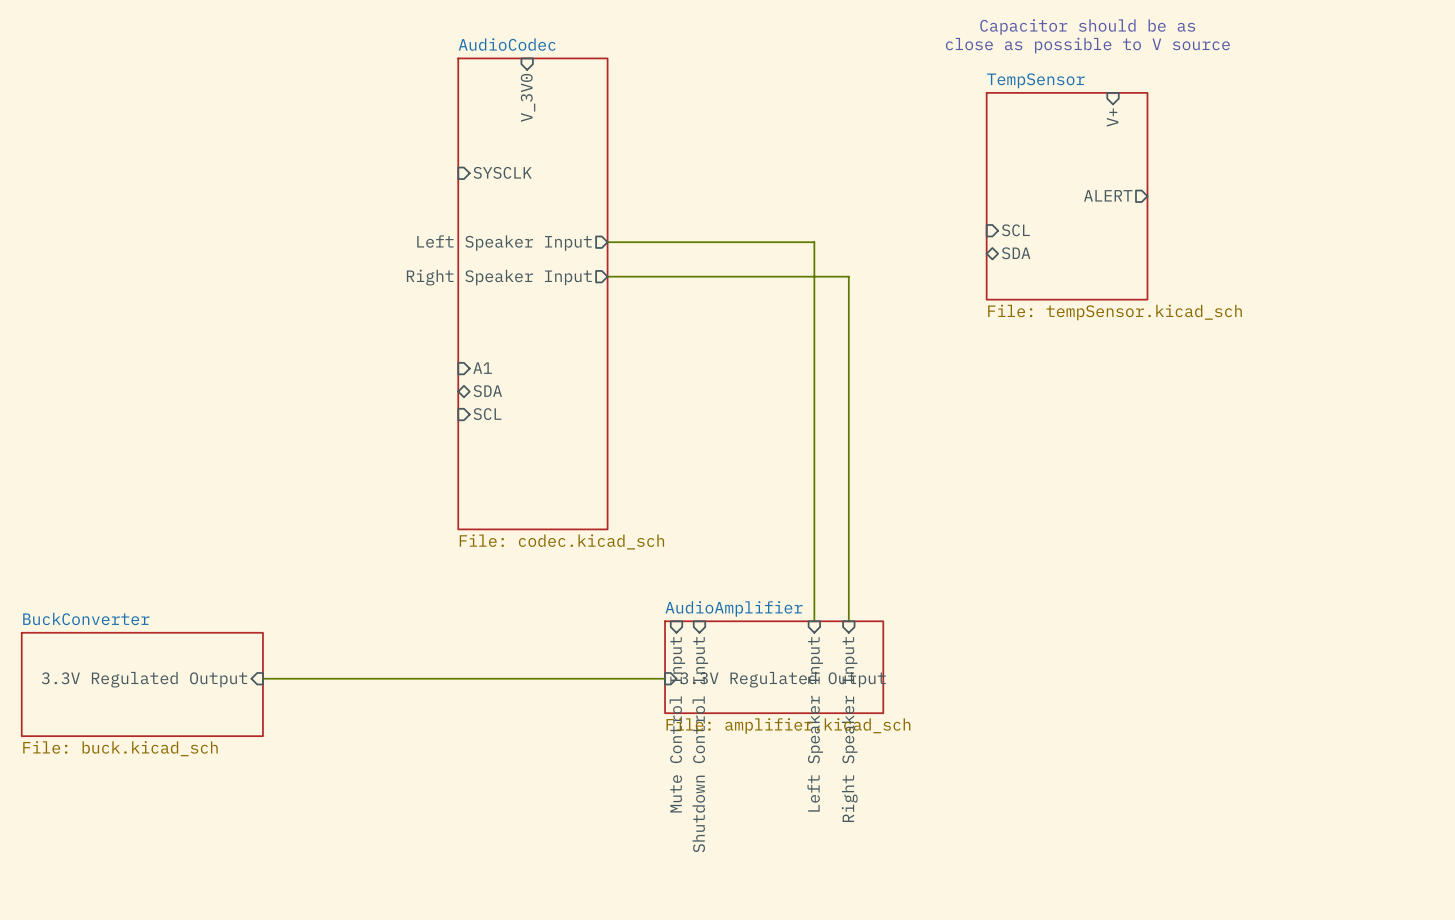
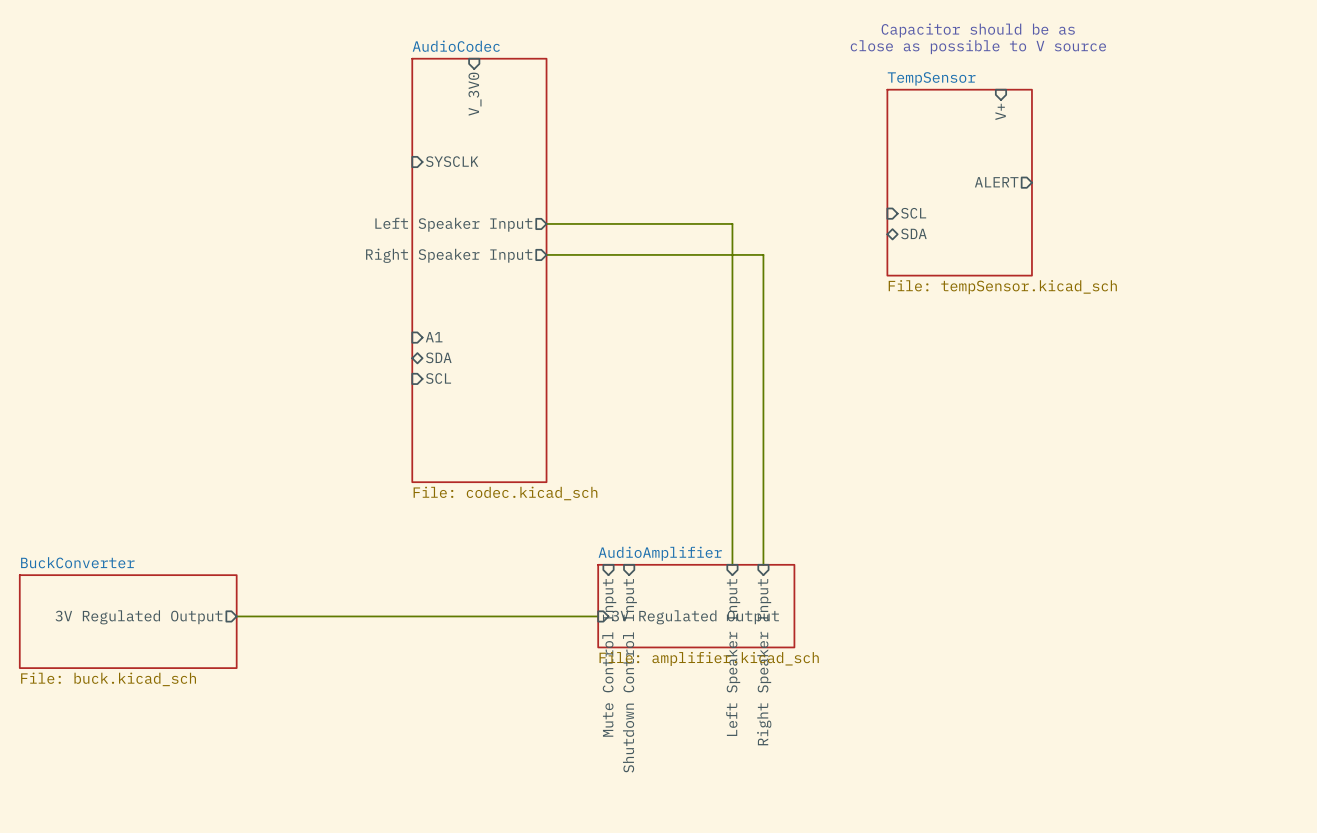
sheet pin shape: input (144, 679) -> output (139, 617)
sheet pin: 3.3V Regulated Output (144, 679) -> 3V Regulated Output (139, 617)
sheet pin: 3.3V Regulated Output (783, 679) -> 3V Regulated Output (695, 617)

